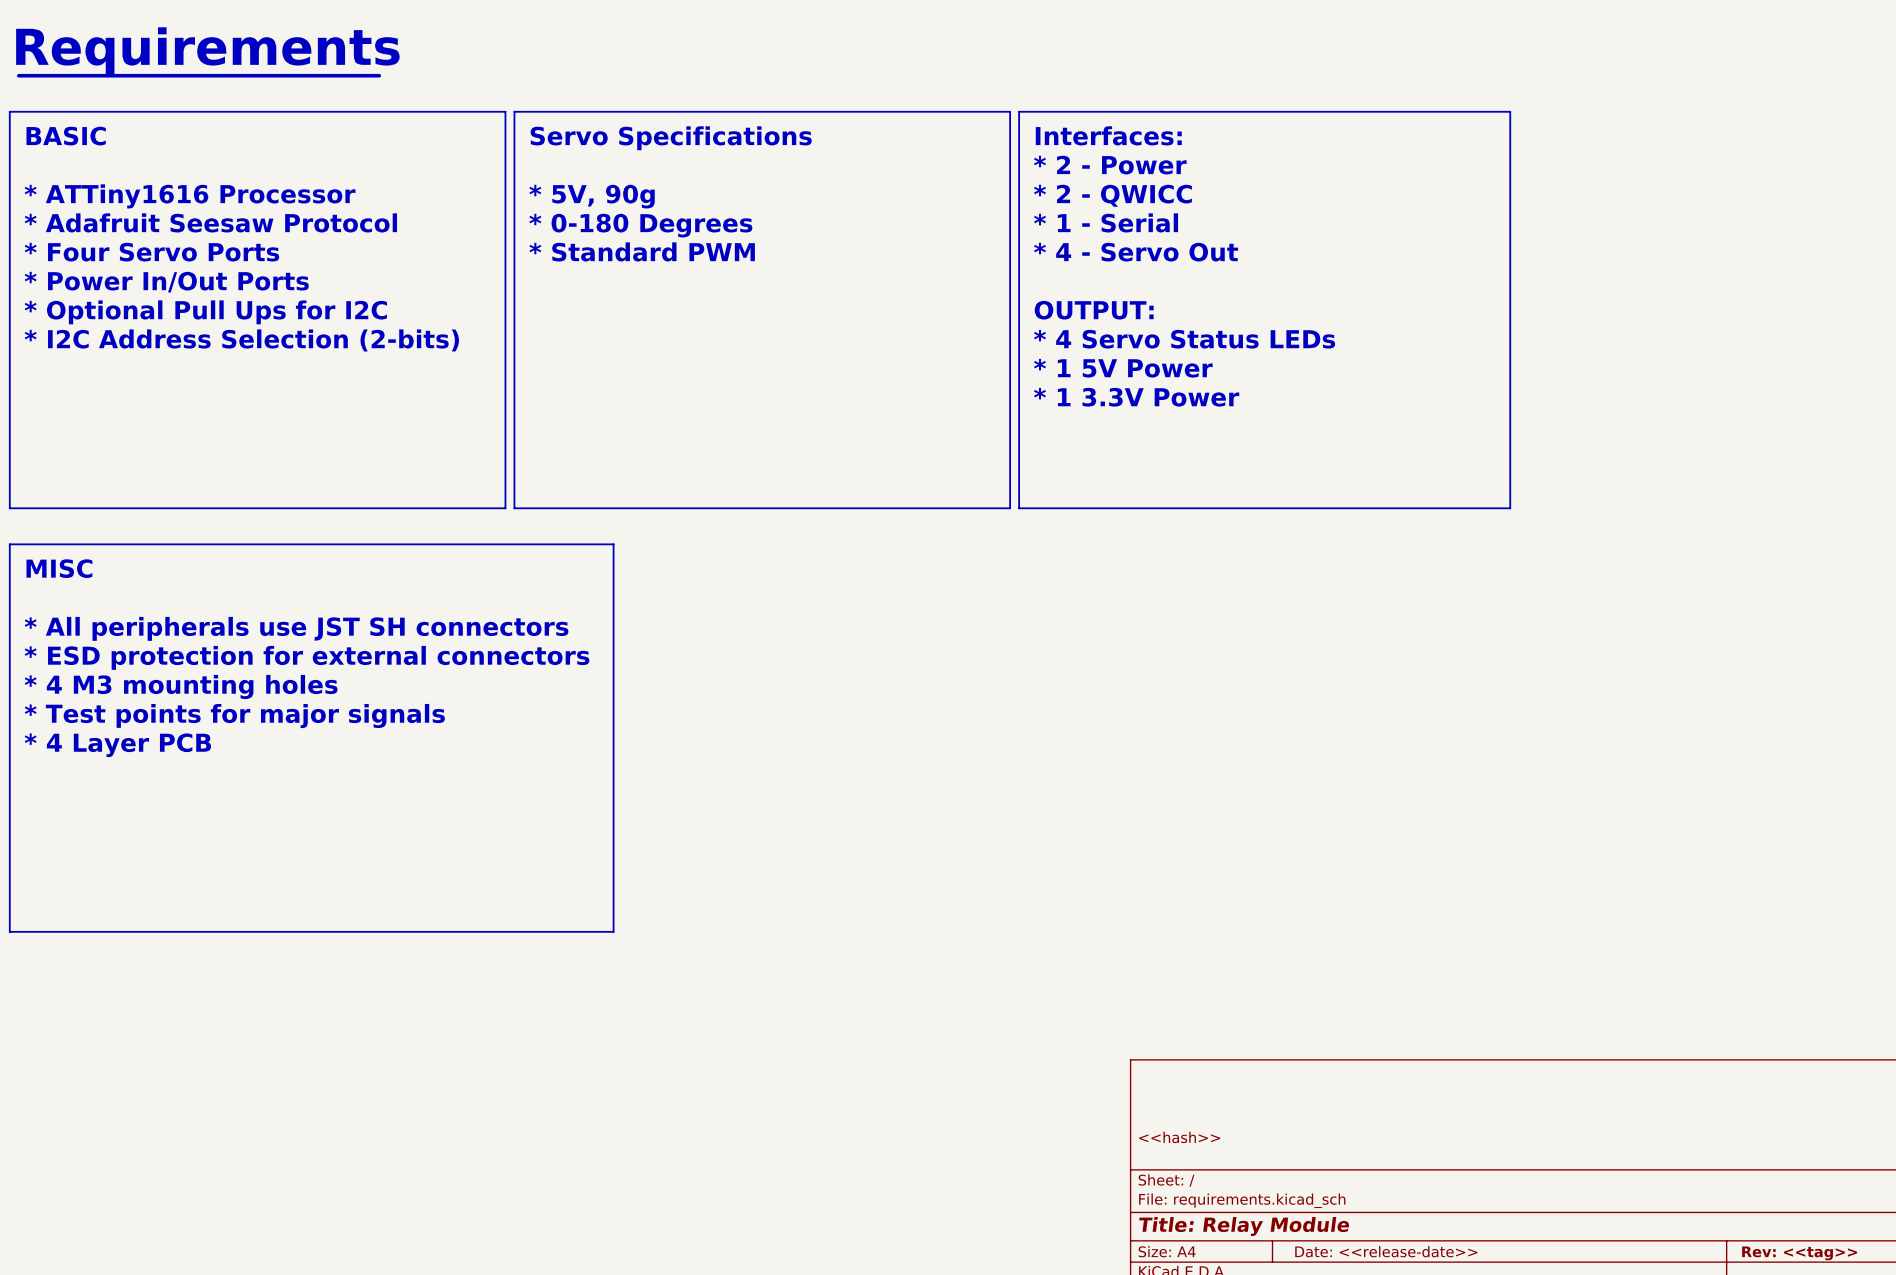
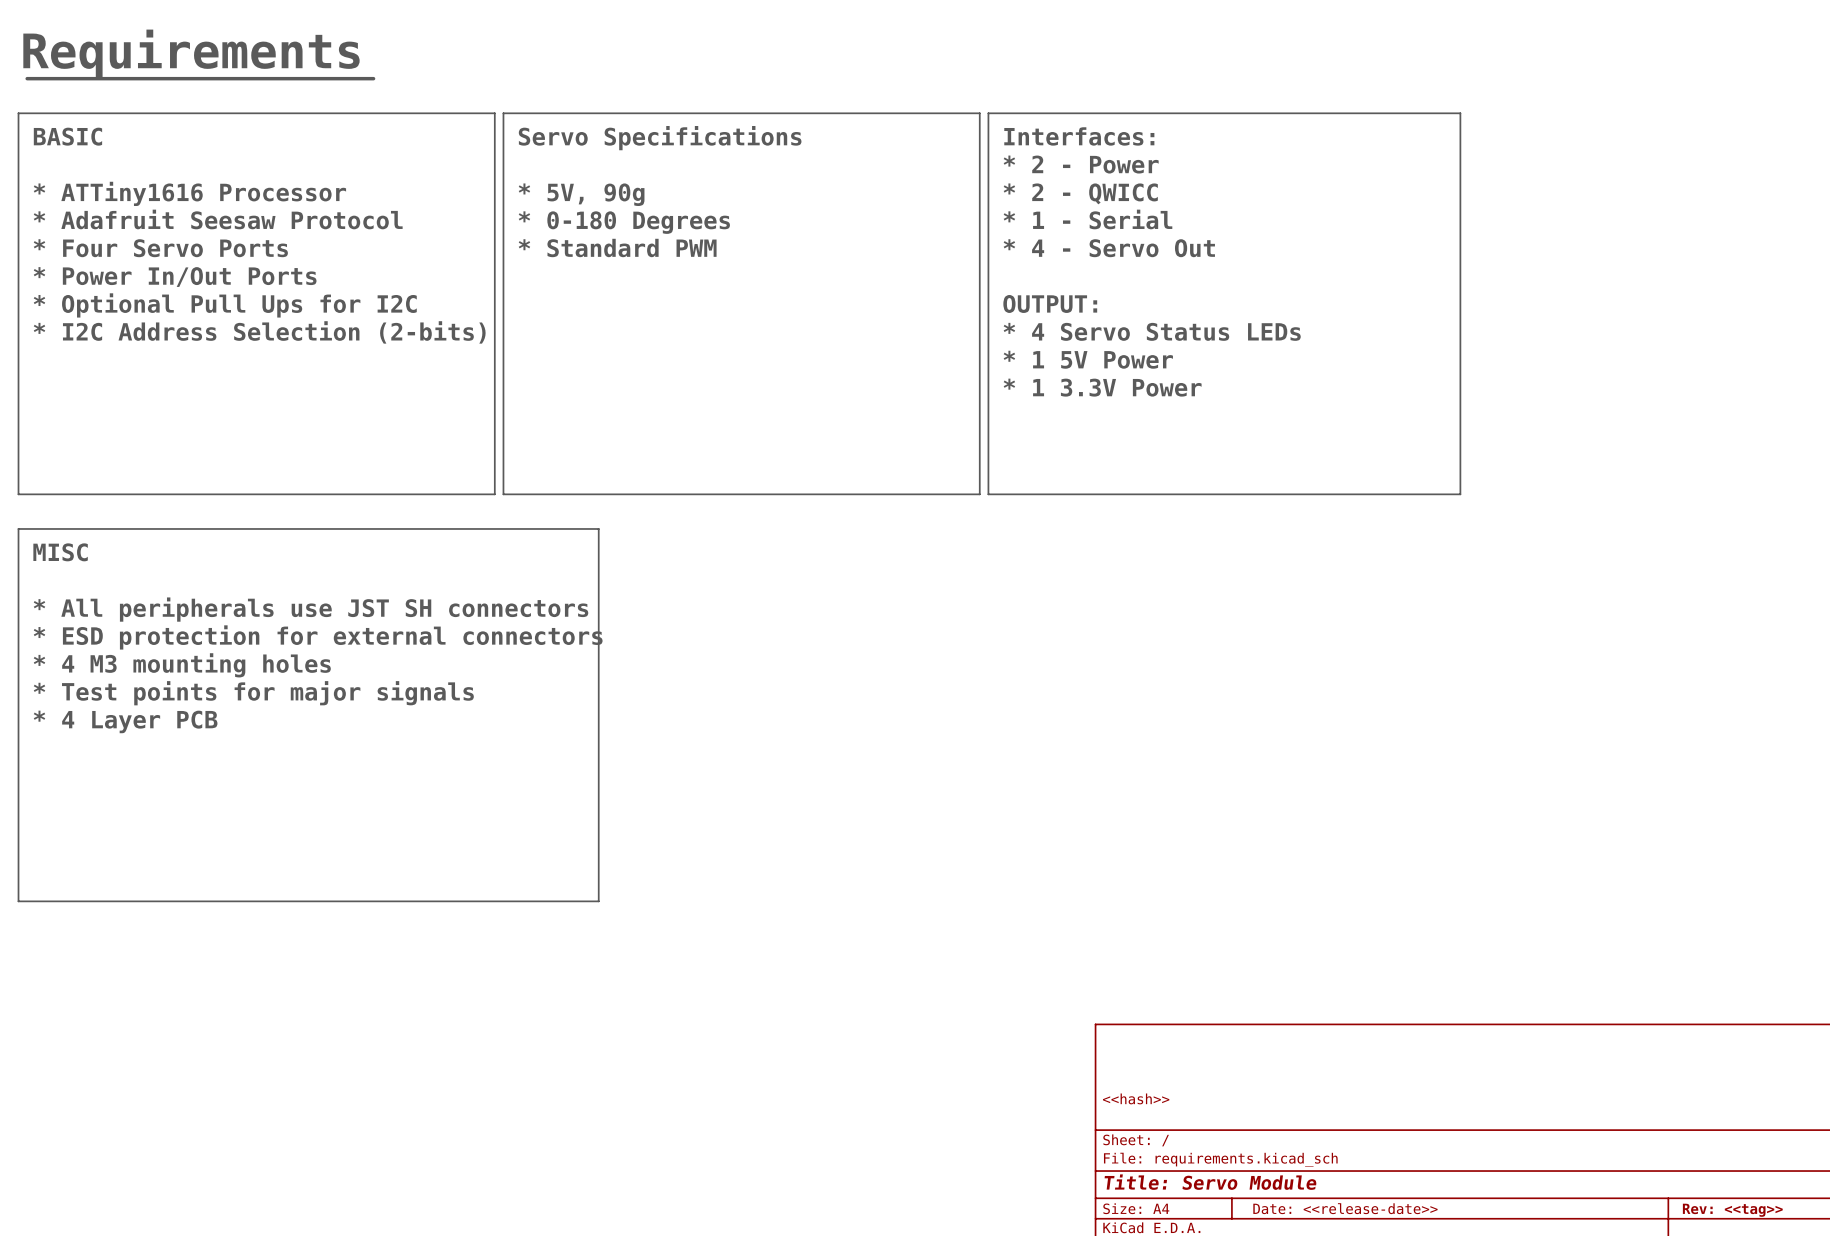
title block: Title: Relay Module (1244, 1226) -> Title: Servo Module (1210, 1182)

